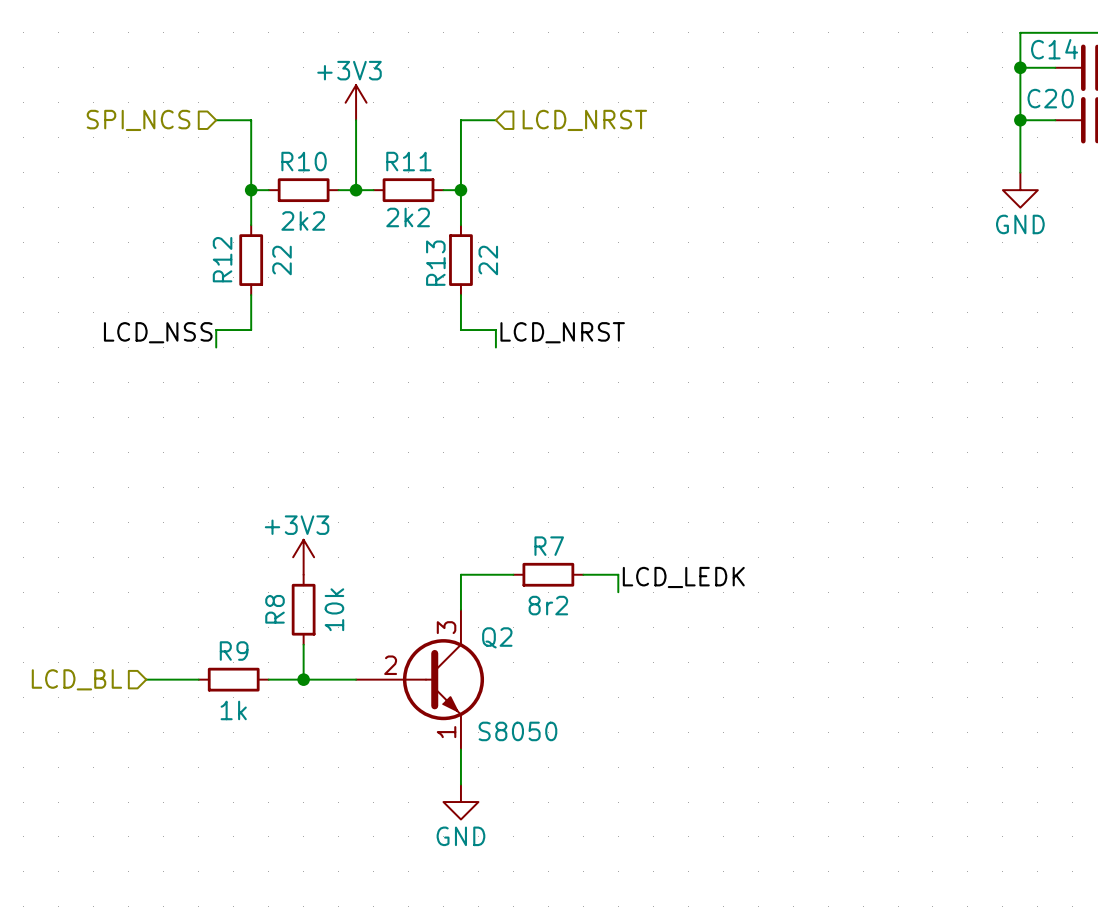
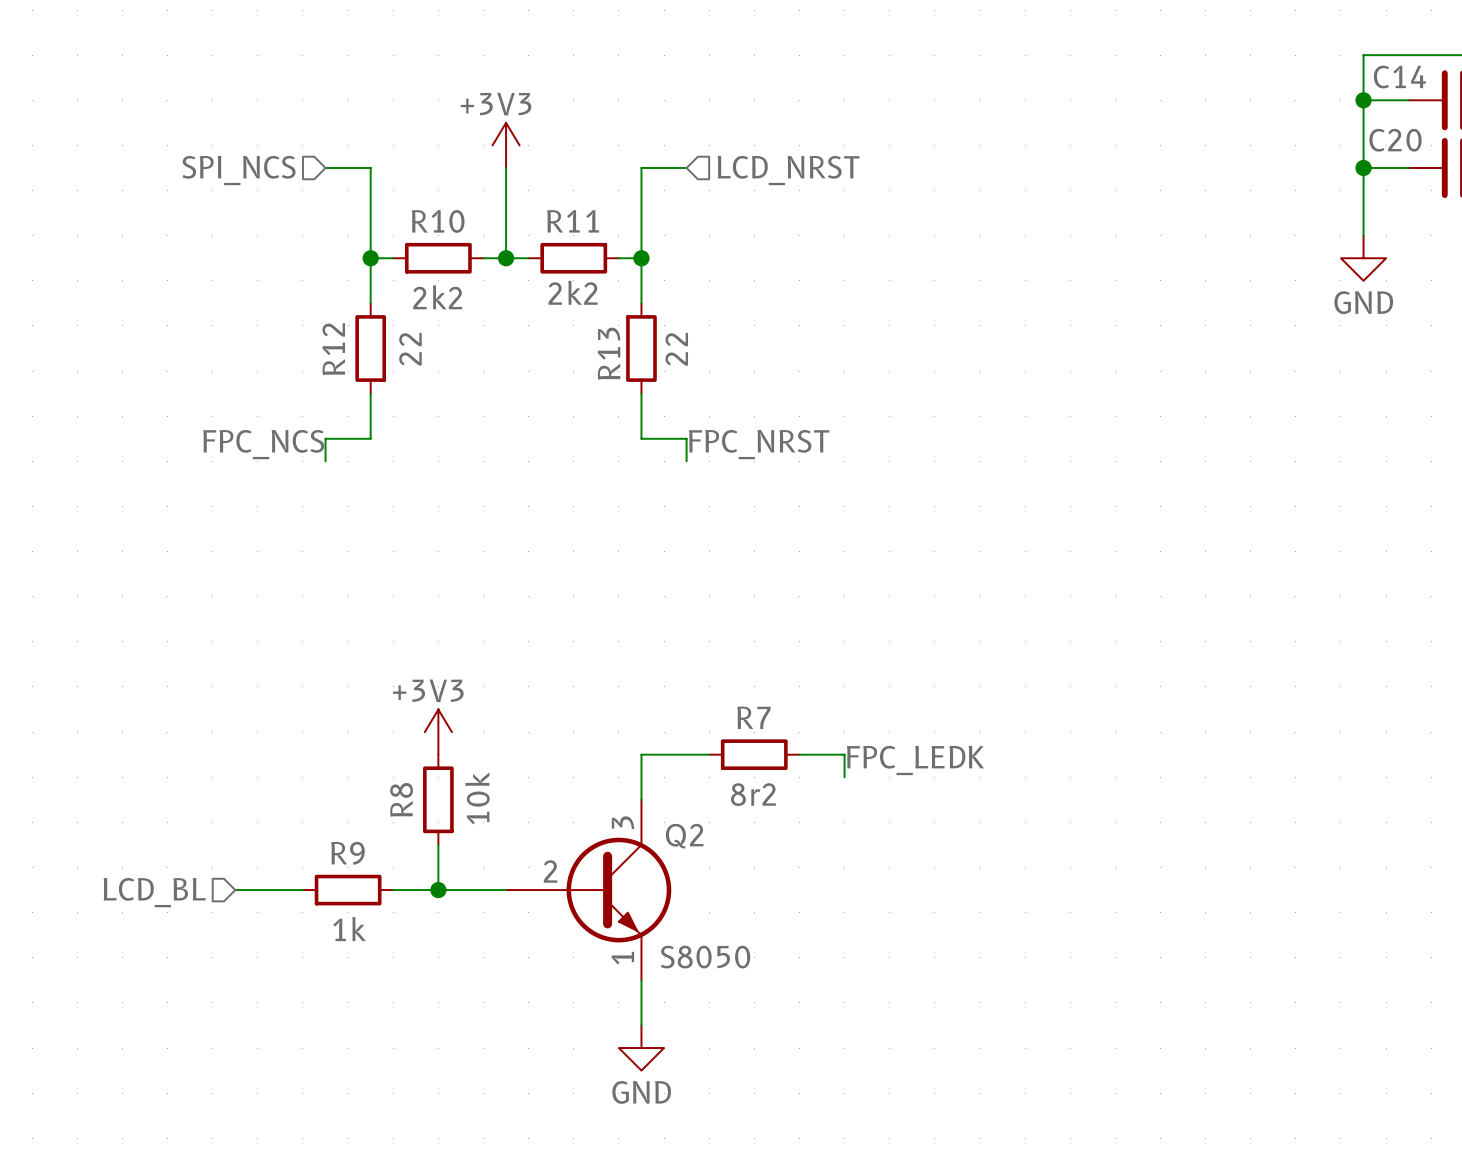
label: LCD_NSS (158, 332) -> FPC_NCS (263, 444)
label: LCD_NRST (562, 332) -> FPC_NRST (759, 444)
label: LCD_LEDK (683, 577) -> FPC_LEDK (915, 760)

